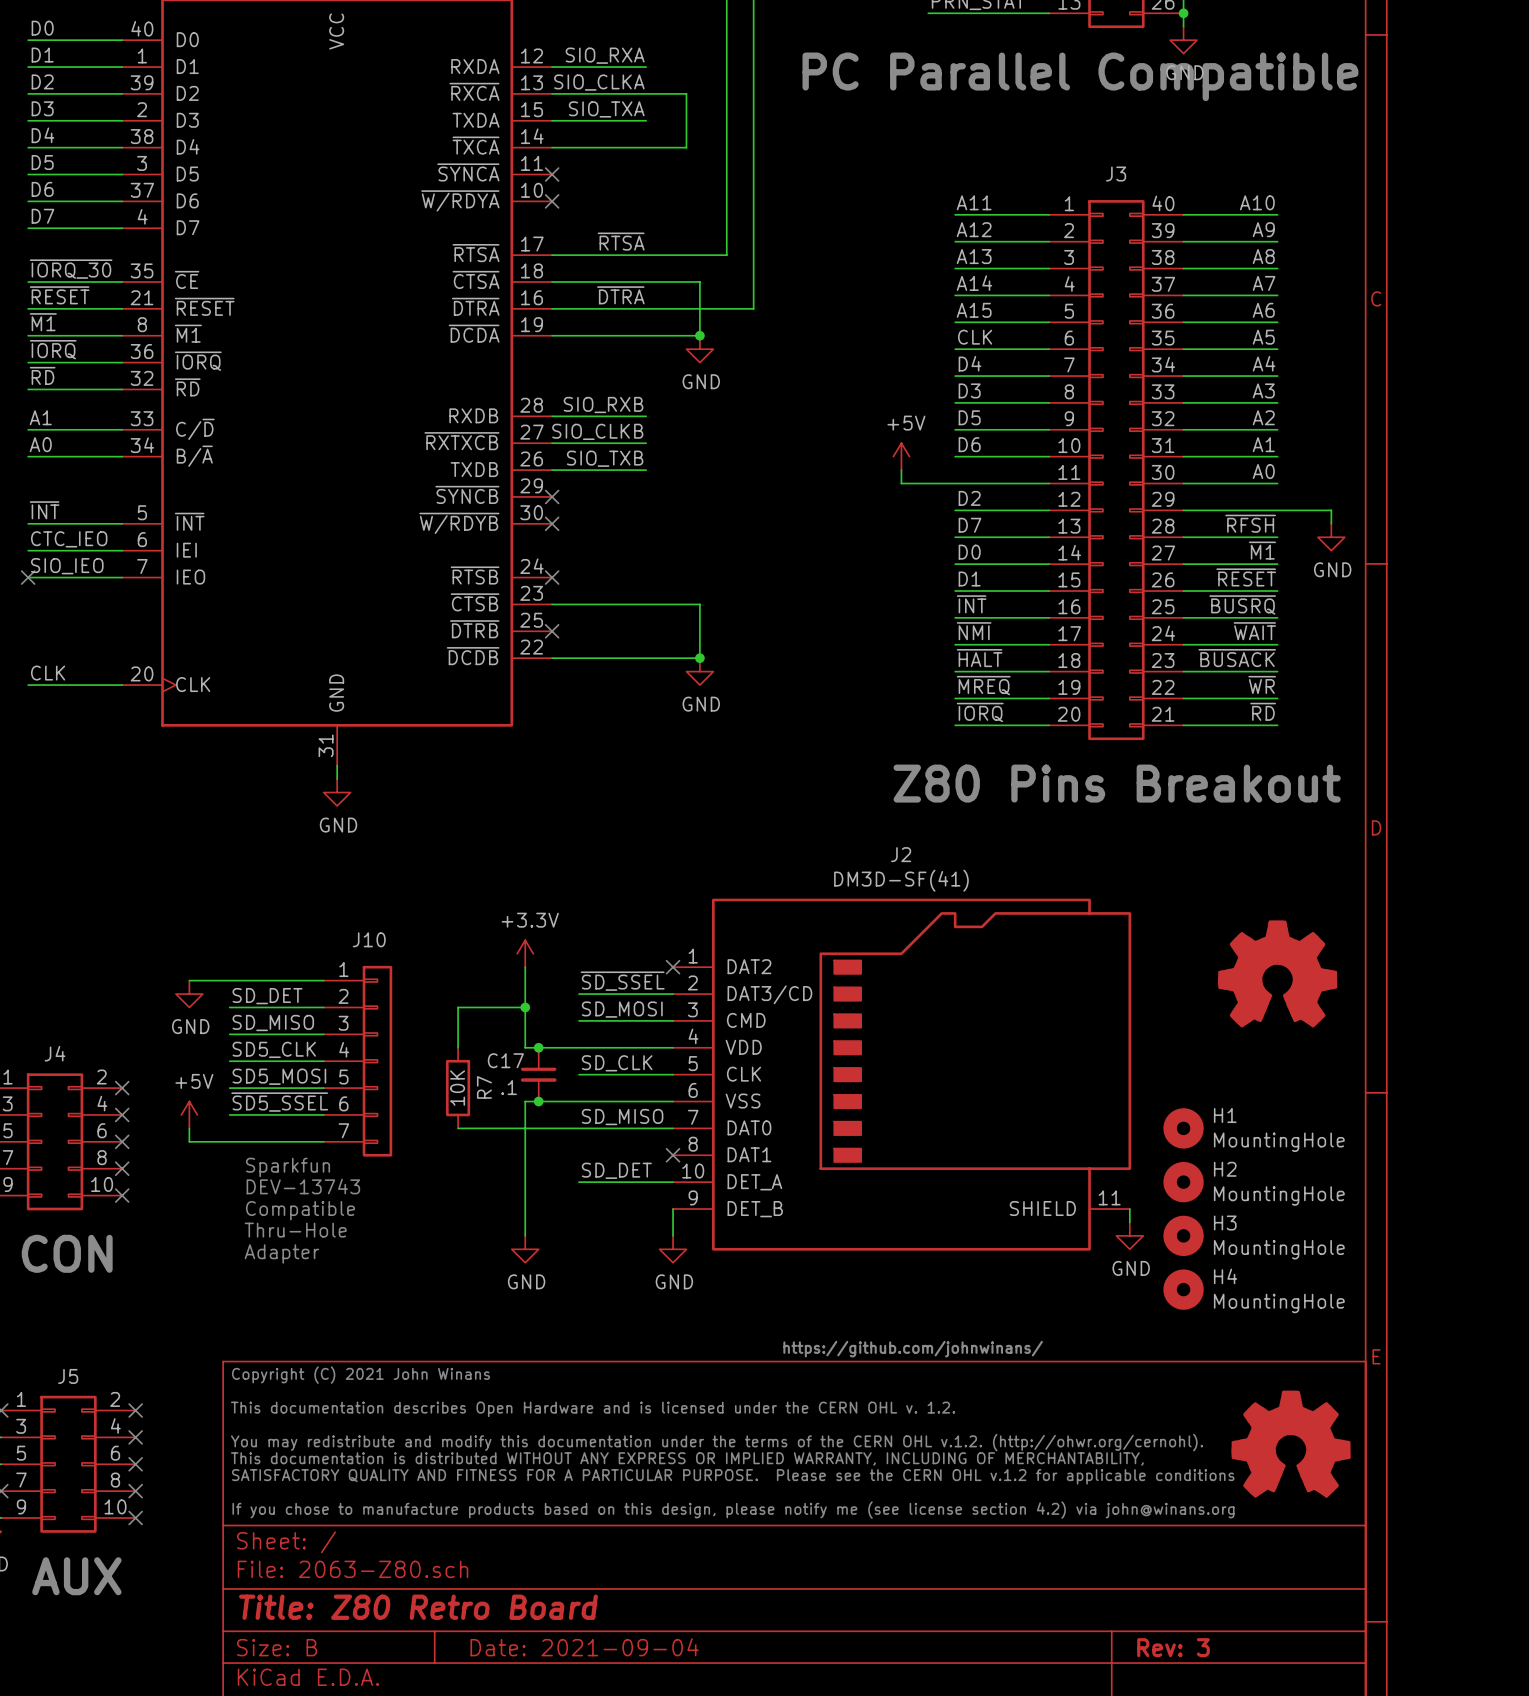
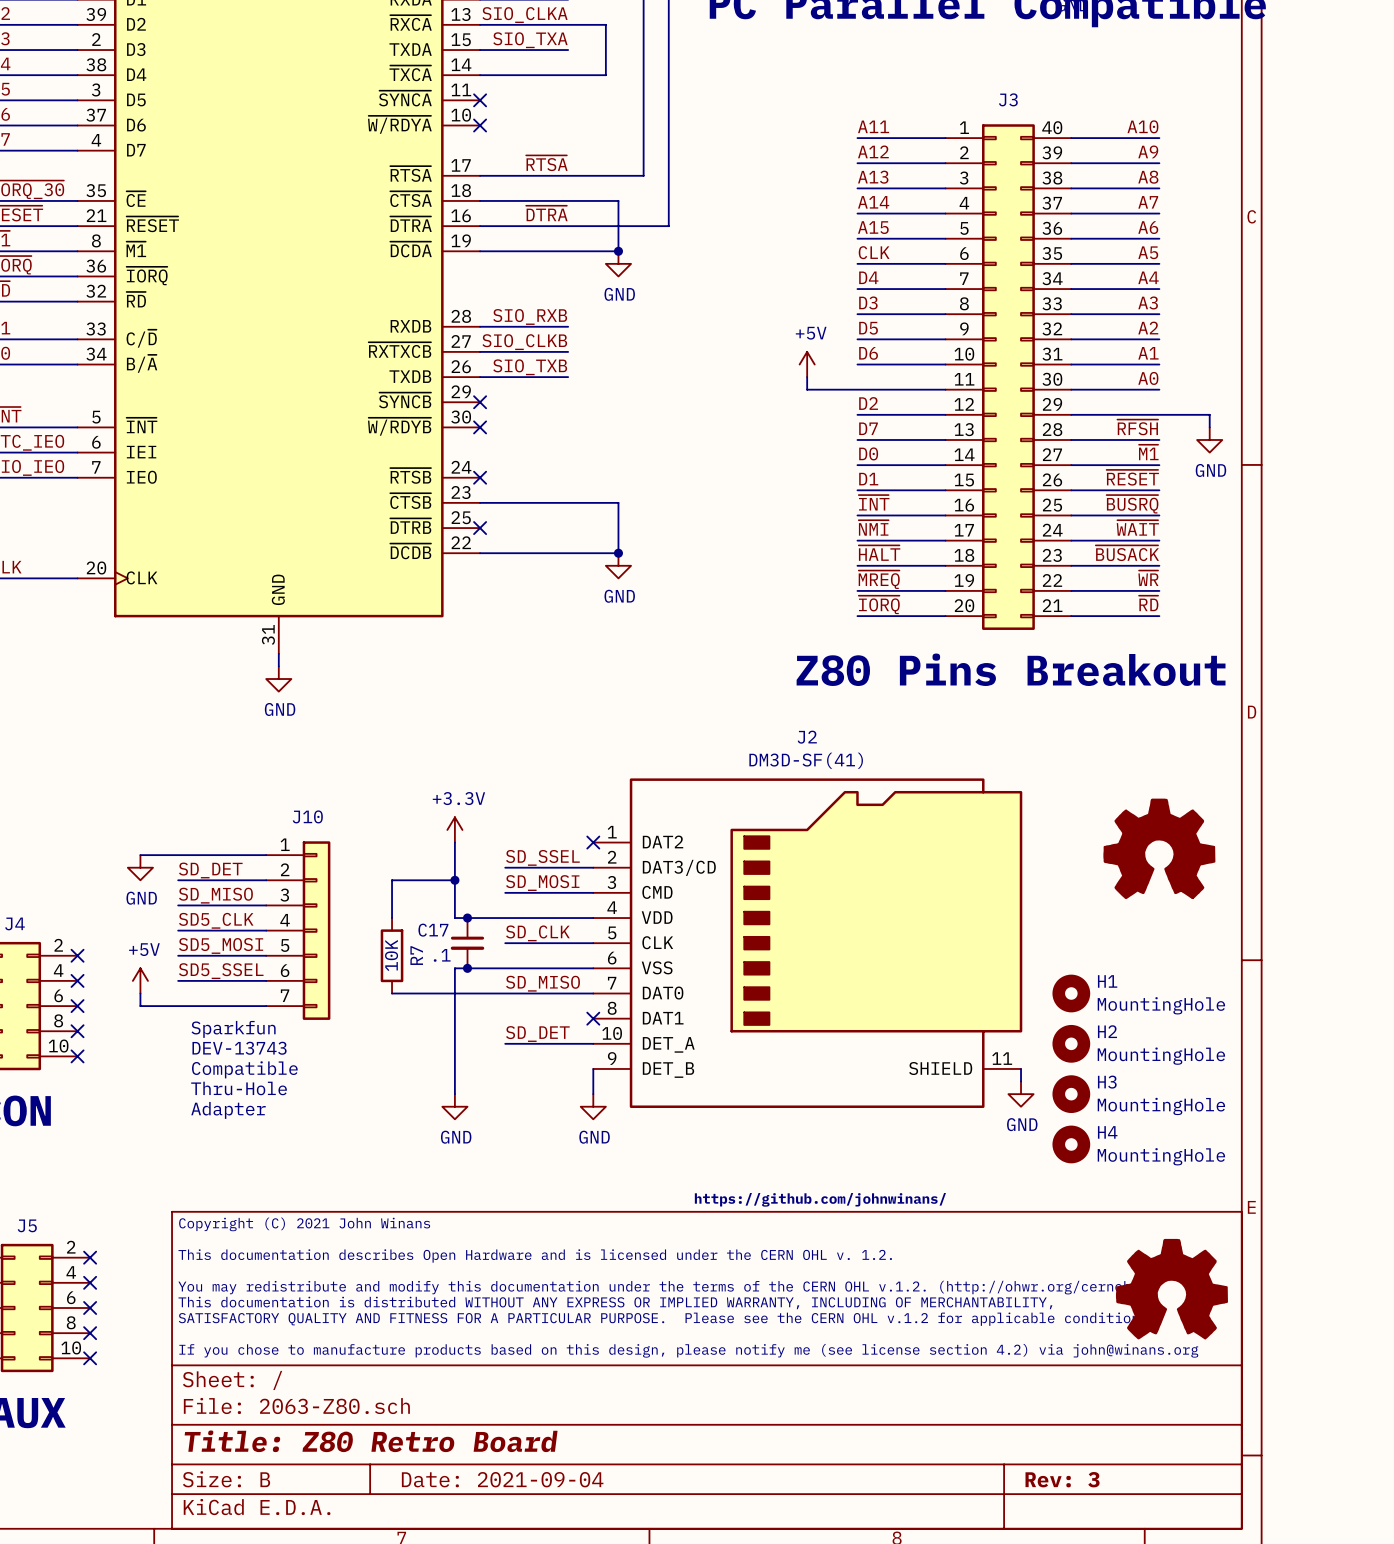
label: ~{SD_SSEL} (622, 981) -> SD_SSEL (542, 857)
label: ~{SD5_SSEL} (279, 1102) -> SD5_SSEL (221, 971)

